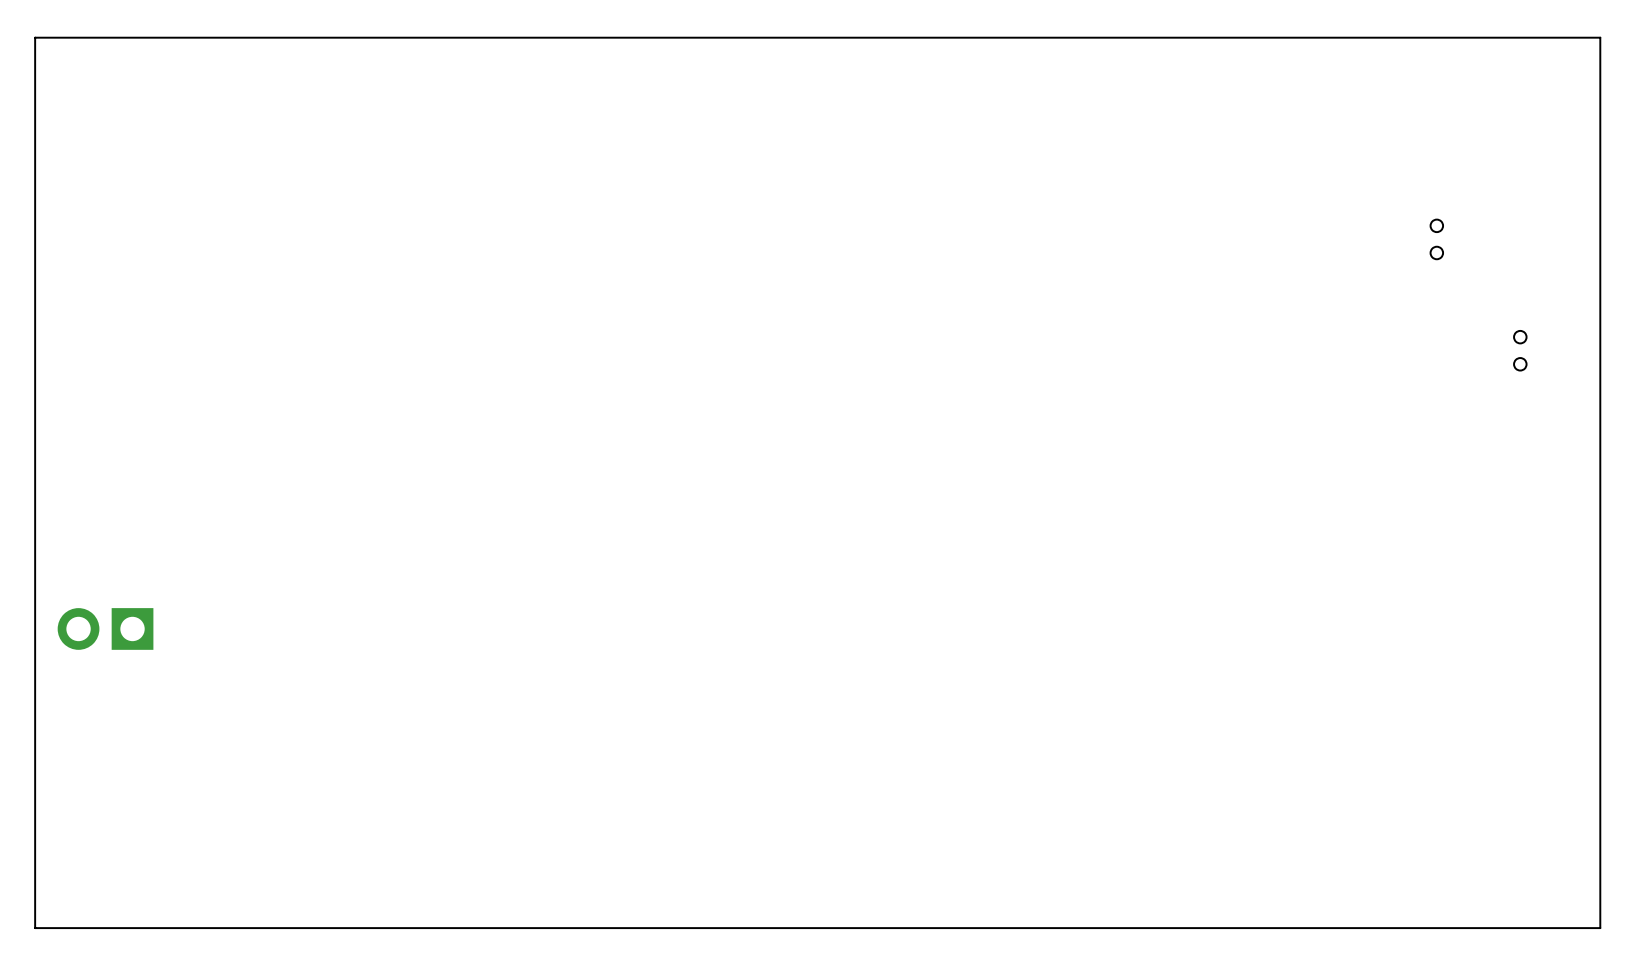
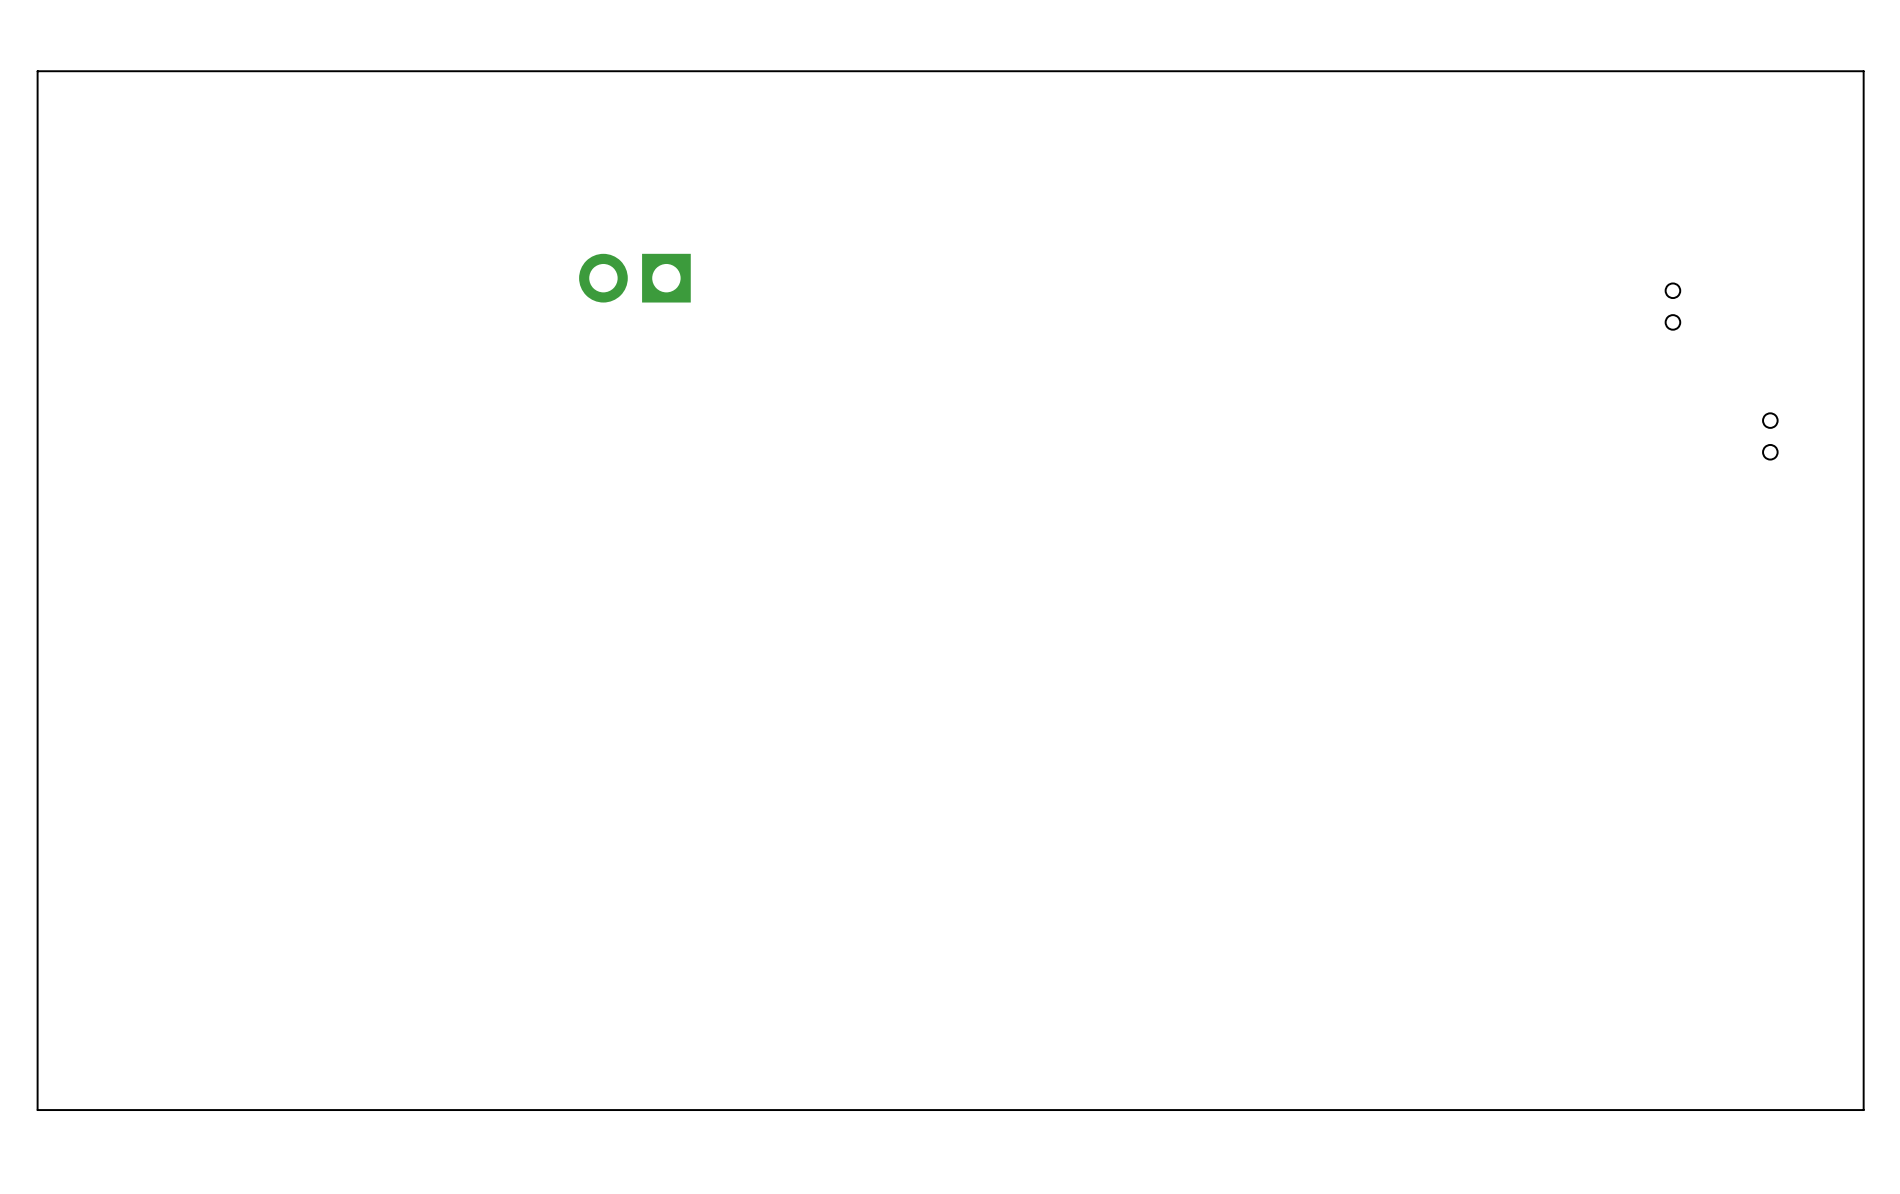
part: none -> (634, 278)
part: (105, 628) -> none

